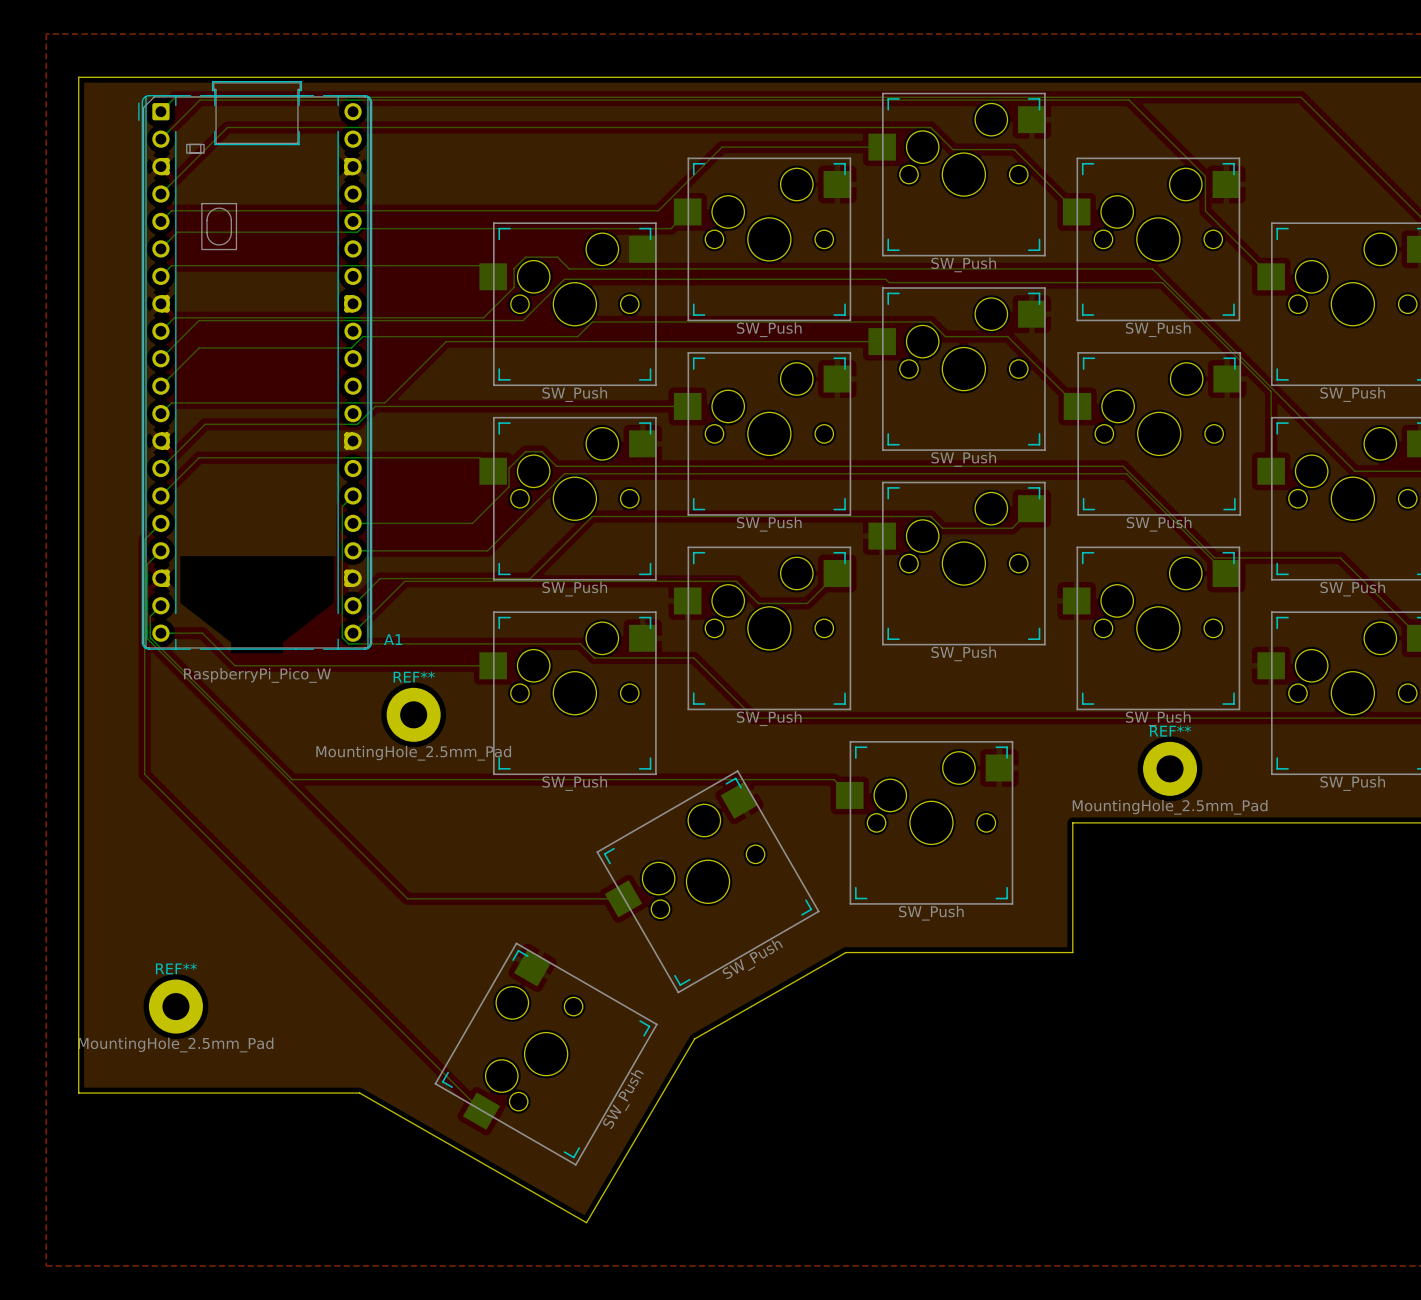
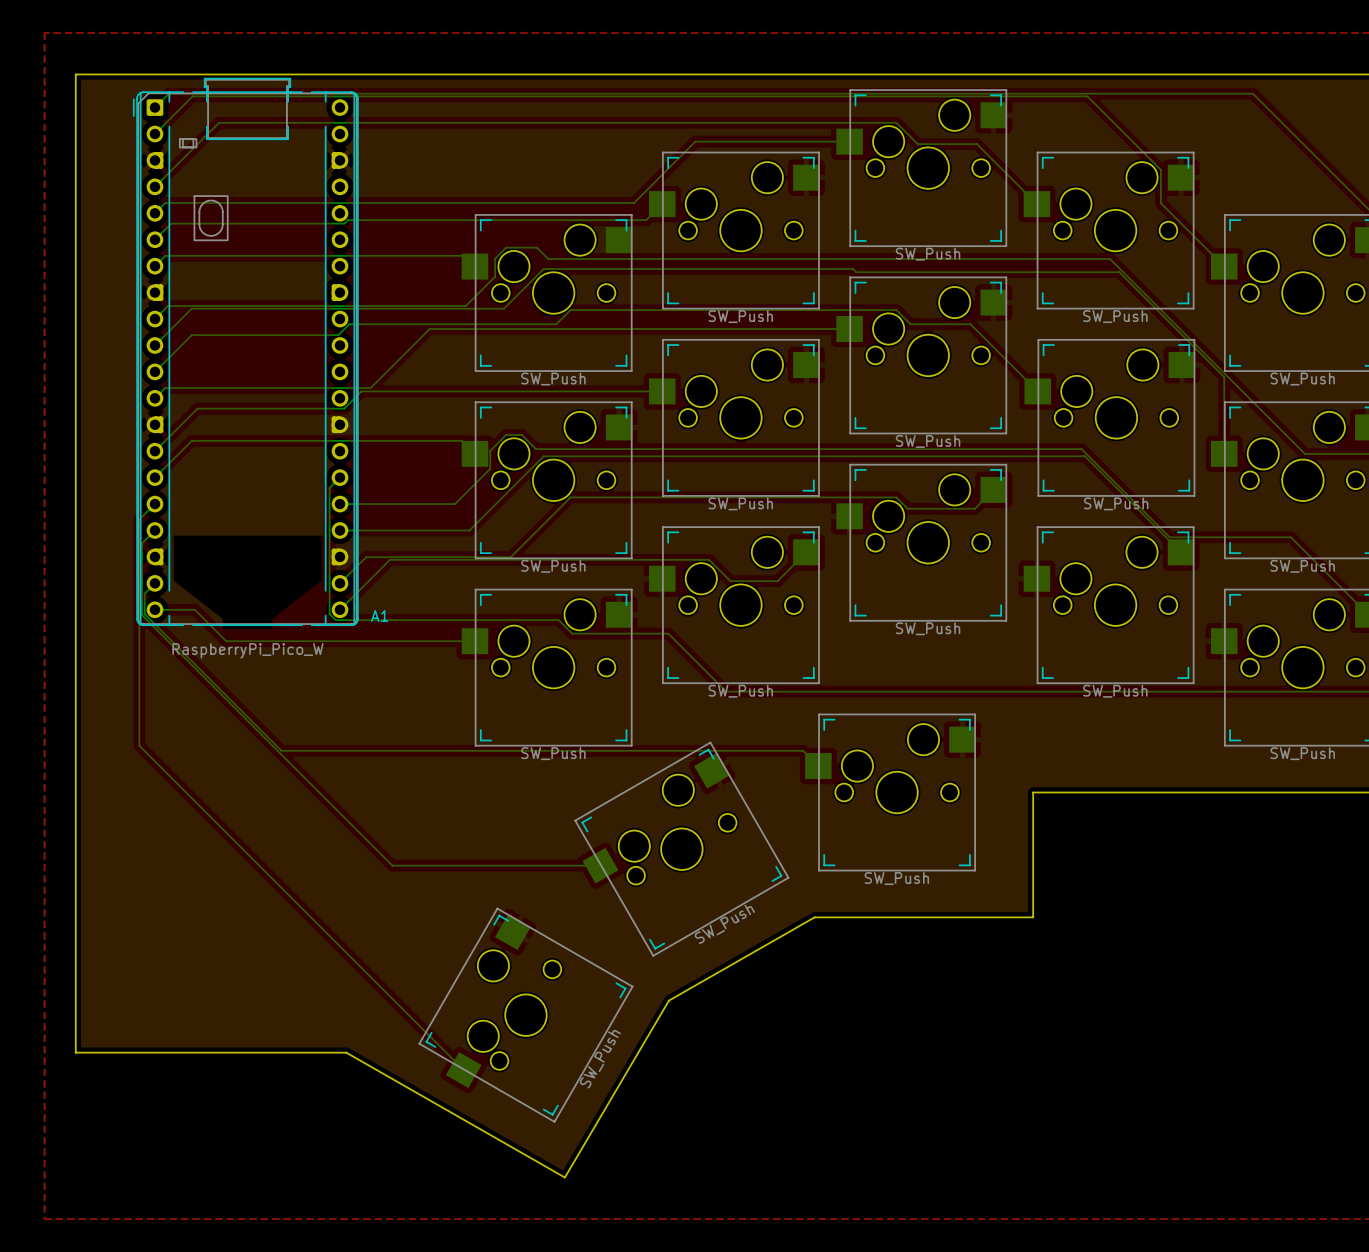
REF**: MountingHole_2.5mm_Pad (413, 714) -> none
REF**: MountingHole_2.5mm_Pad (1170, 768) -> none
REF**: MountingHole_2.5mm_Pad (175, 1006) -> none

